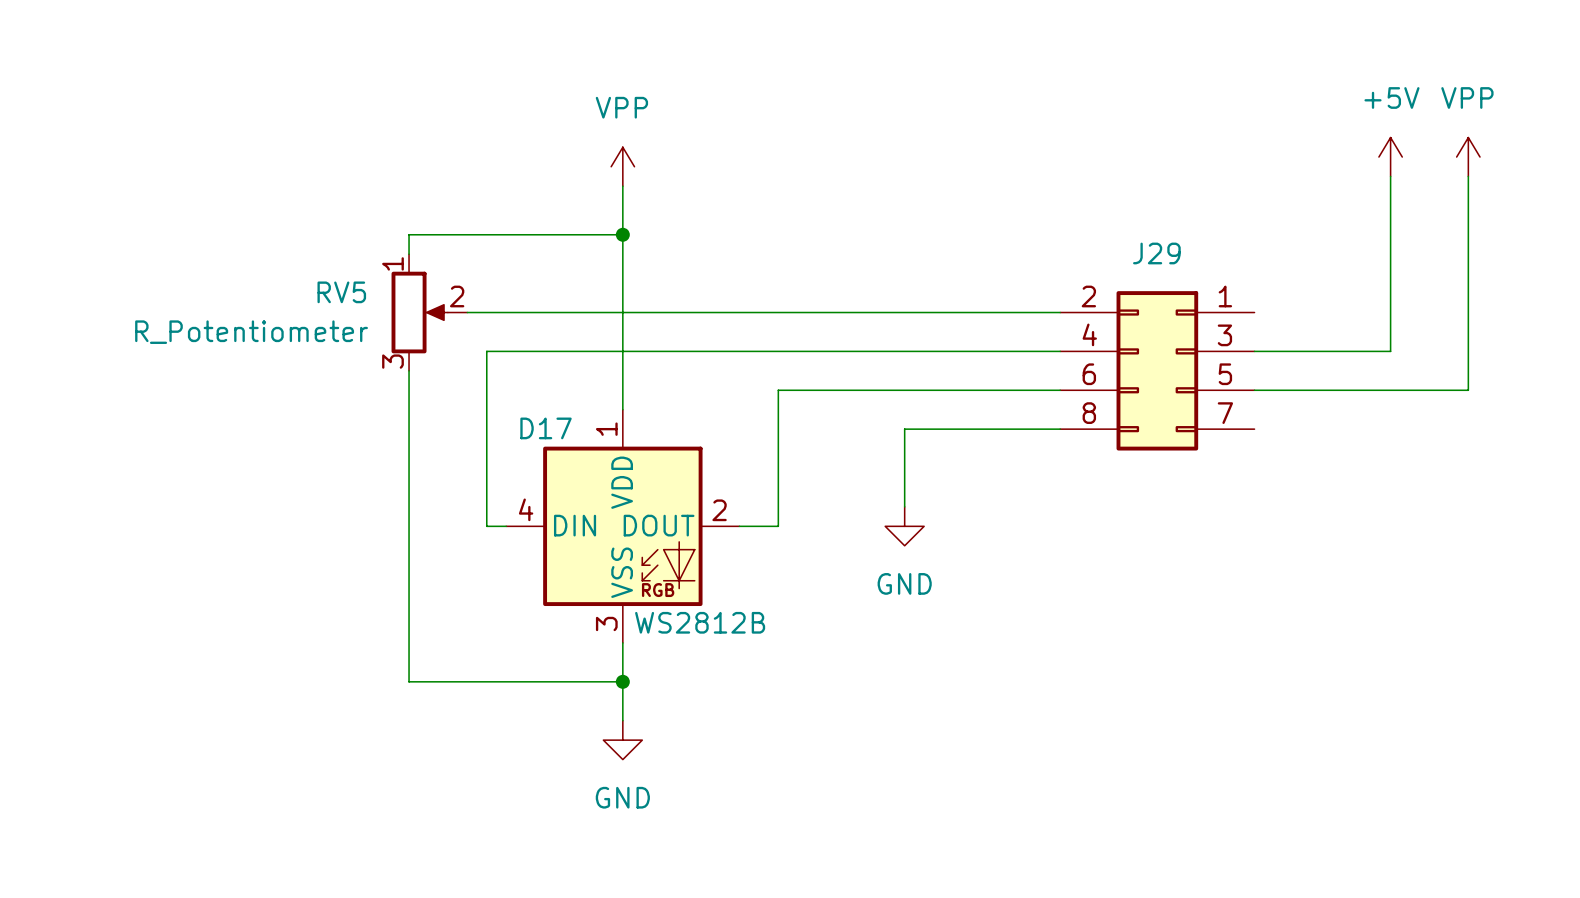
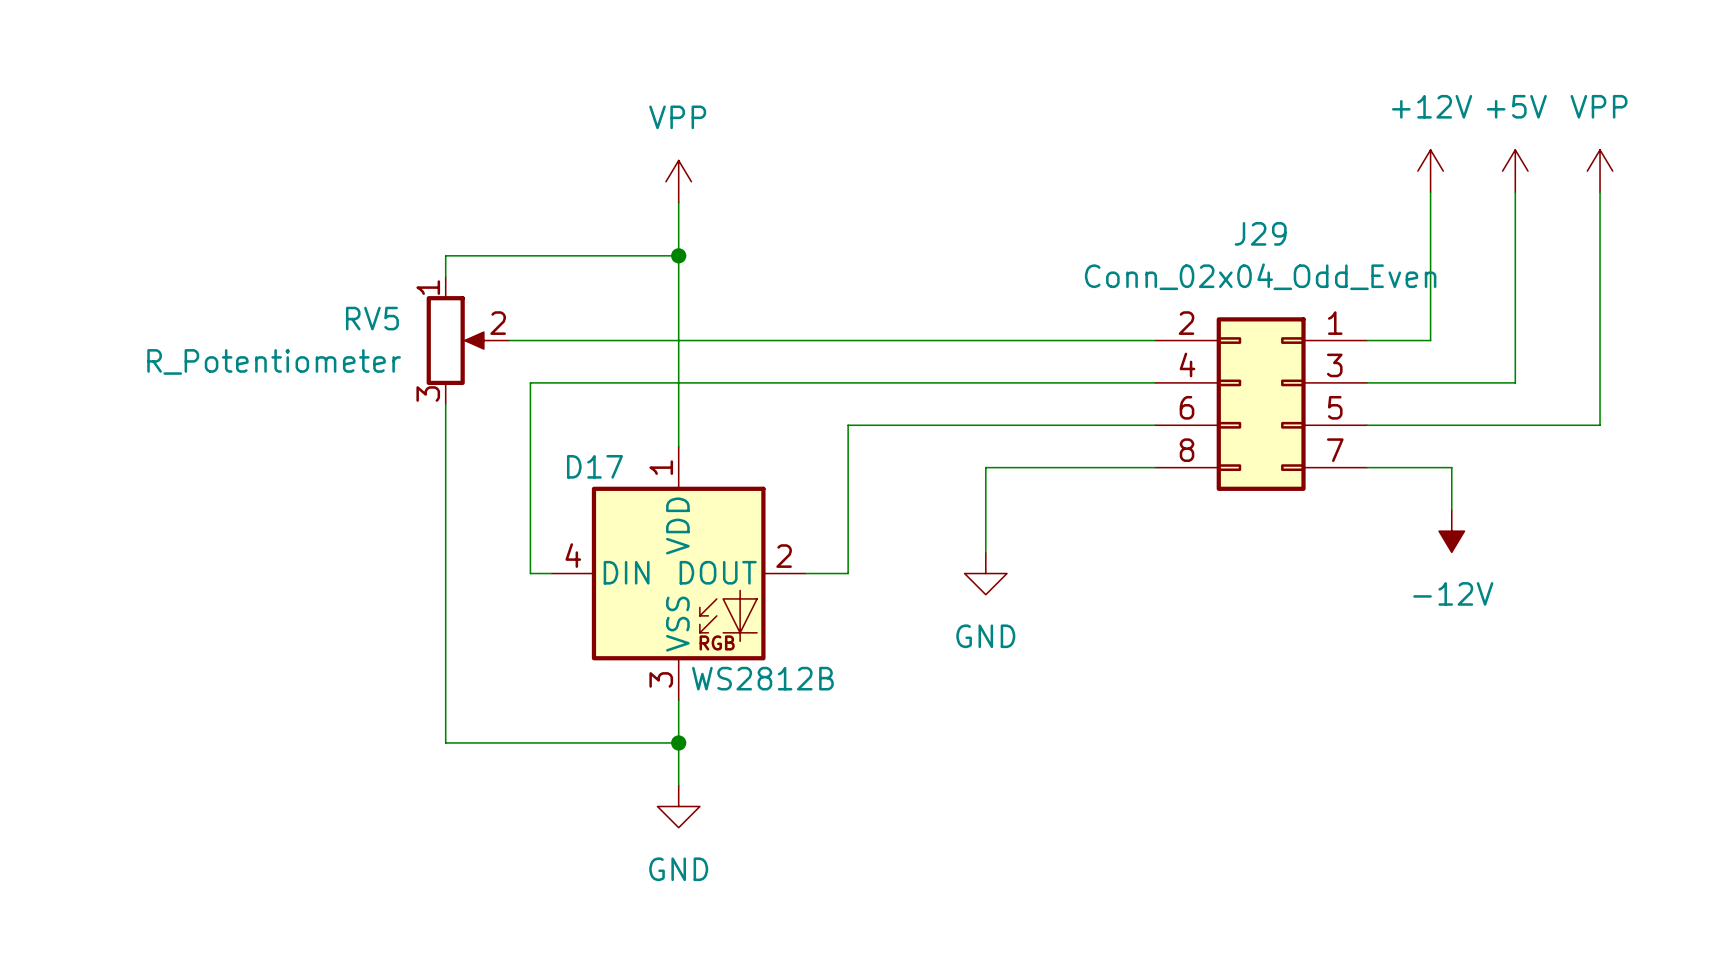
power symbol: none -> +12V (1430, 171)
wire: none -> (1430, 192) (1430, 340) (1367, 340)
J29 name position: J29 (1156, 253) -> J29 (1260, 233)
J29 value: none -> Conn_02x04_Odd_Even (1260, 276)
wire: none -> (1367, 467) (1451, 467) (1451, 509)
power symbol: none -> -12V (1451, 531)

